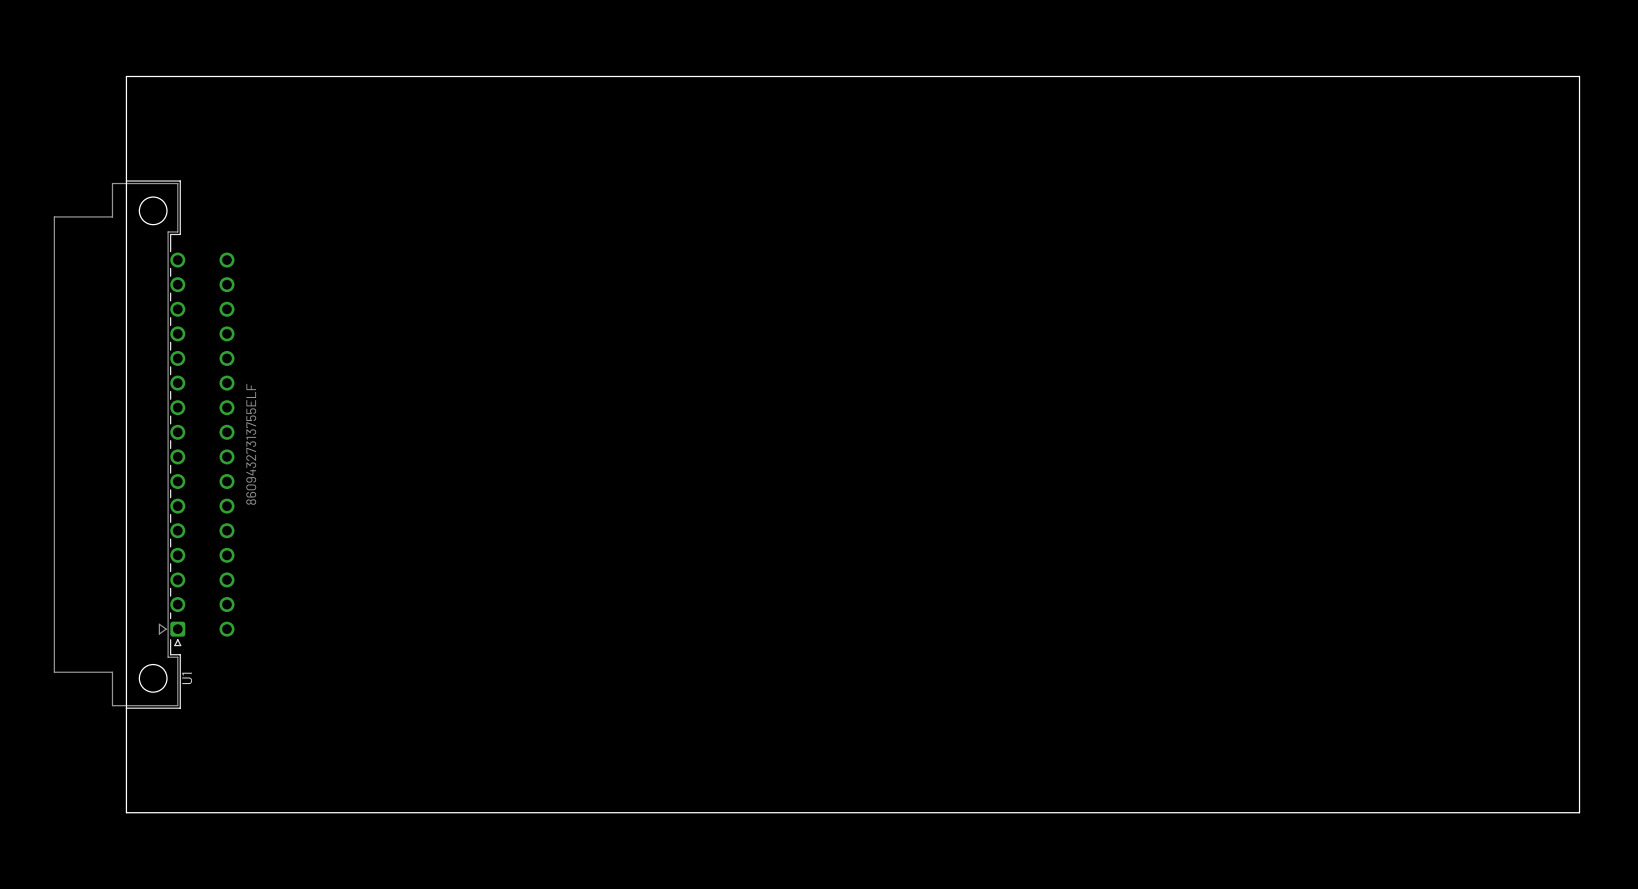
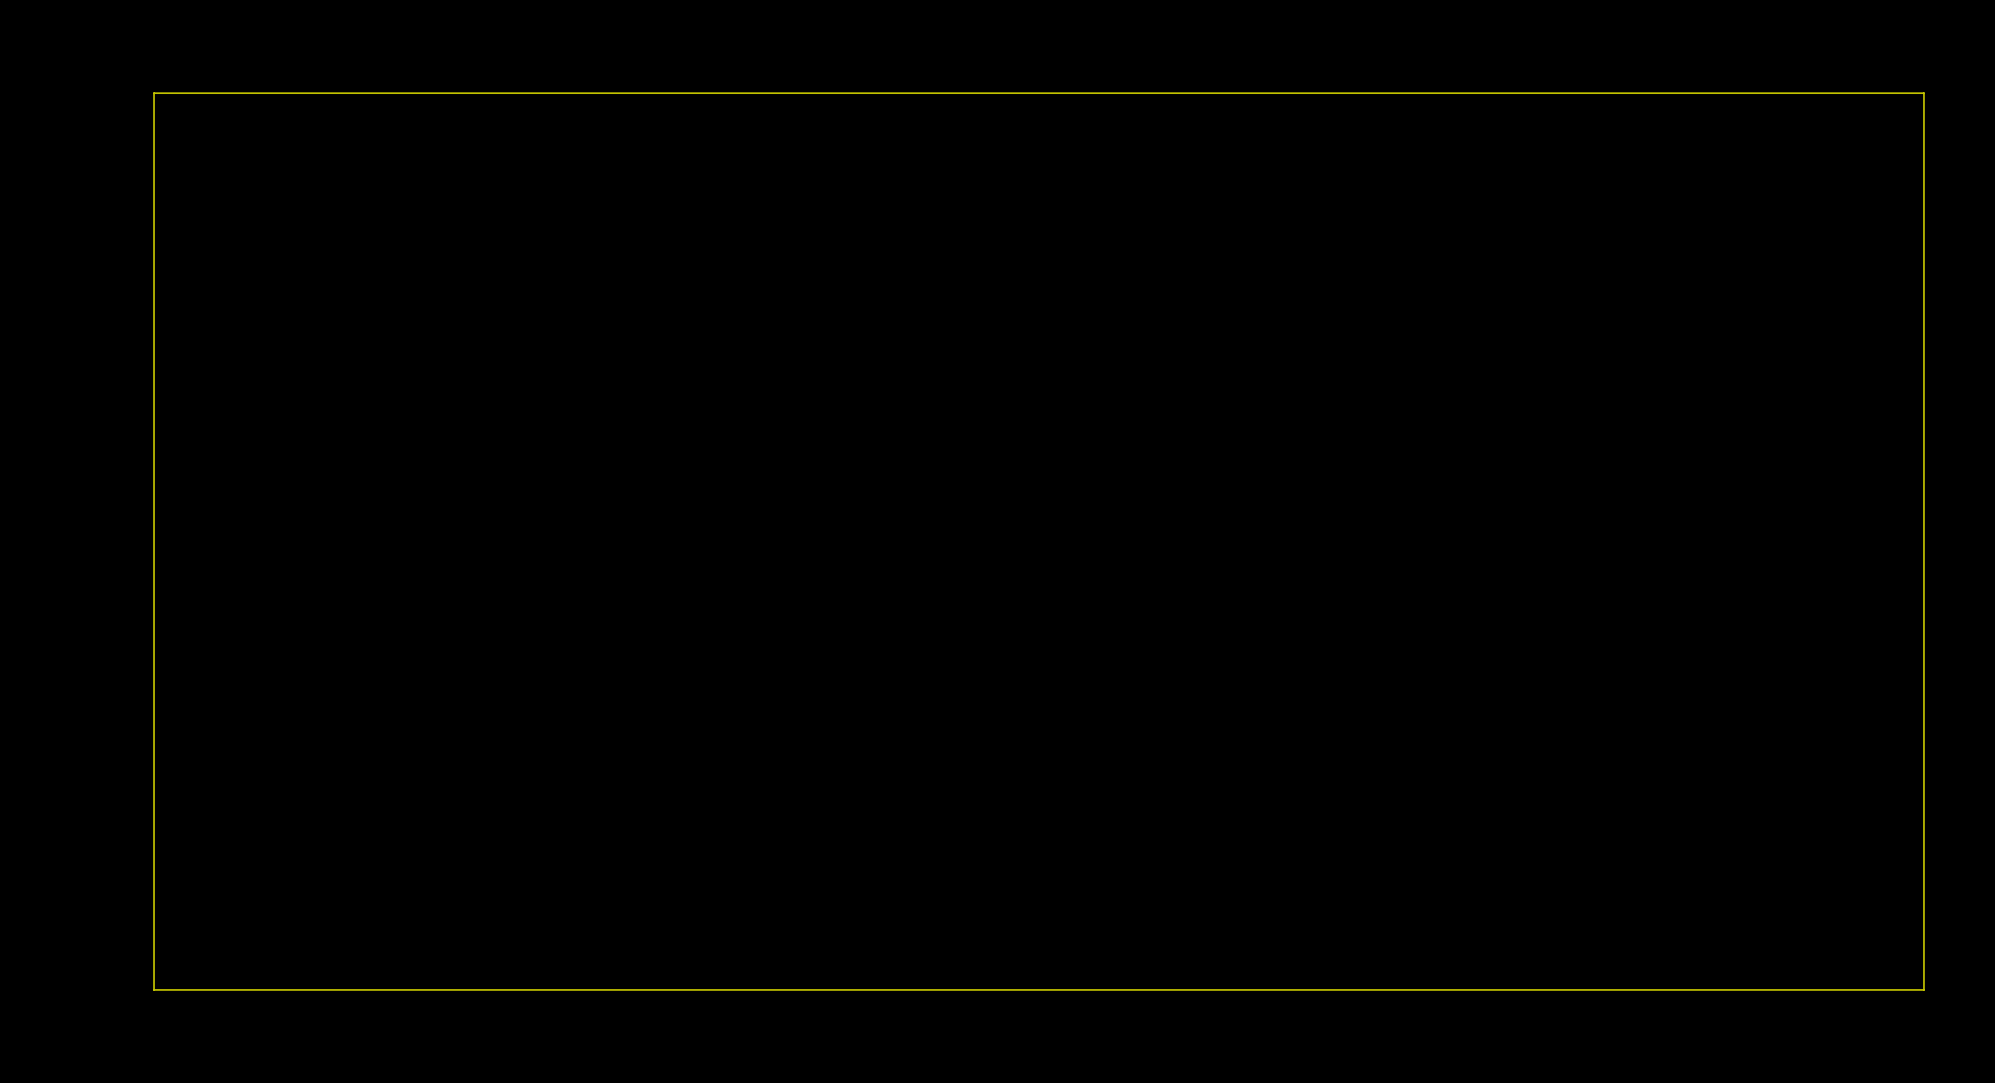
U1: 86094327313755ELF (144, 444) -> none

